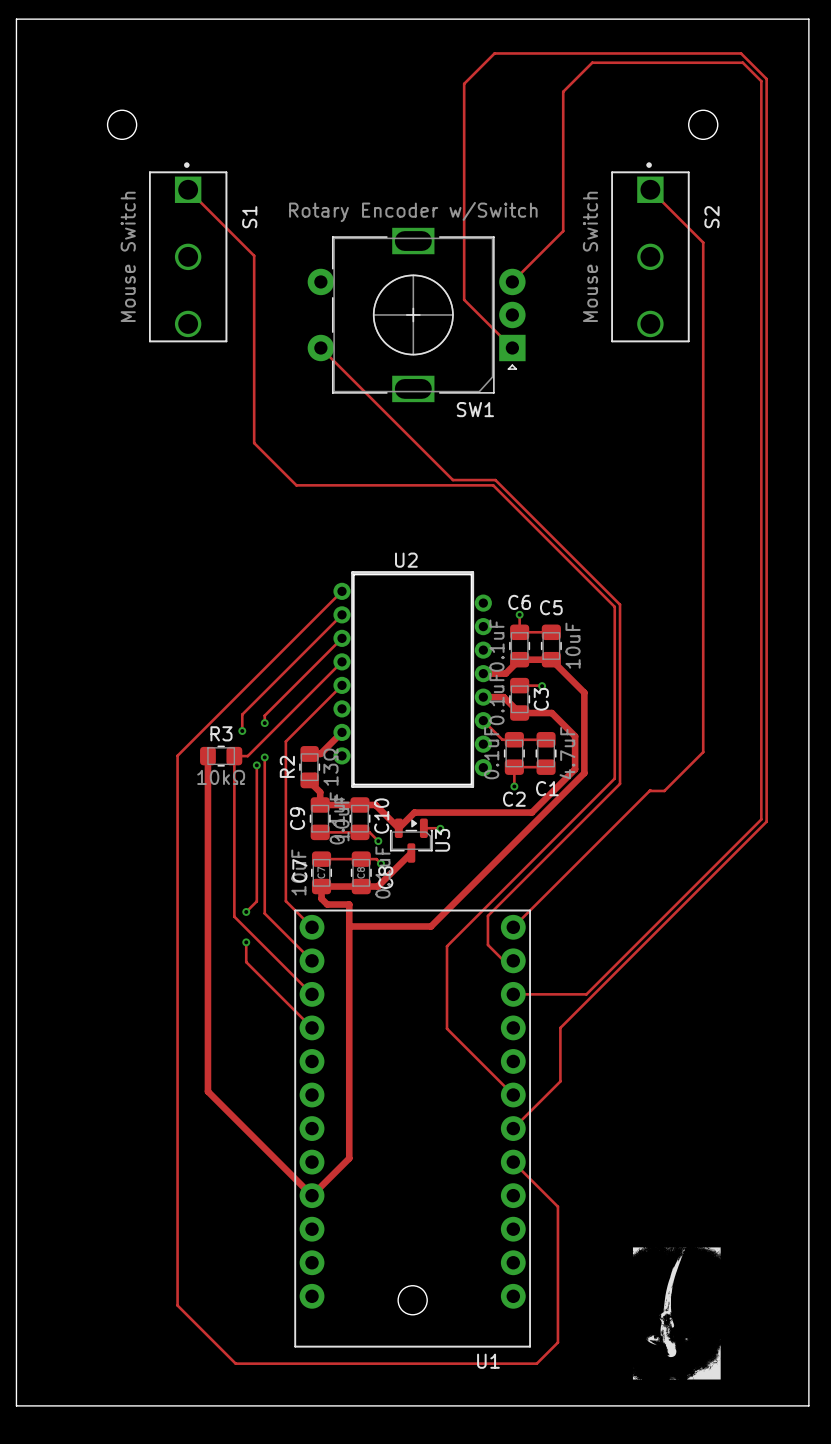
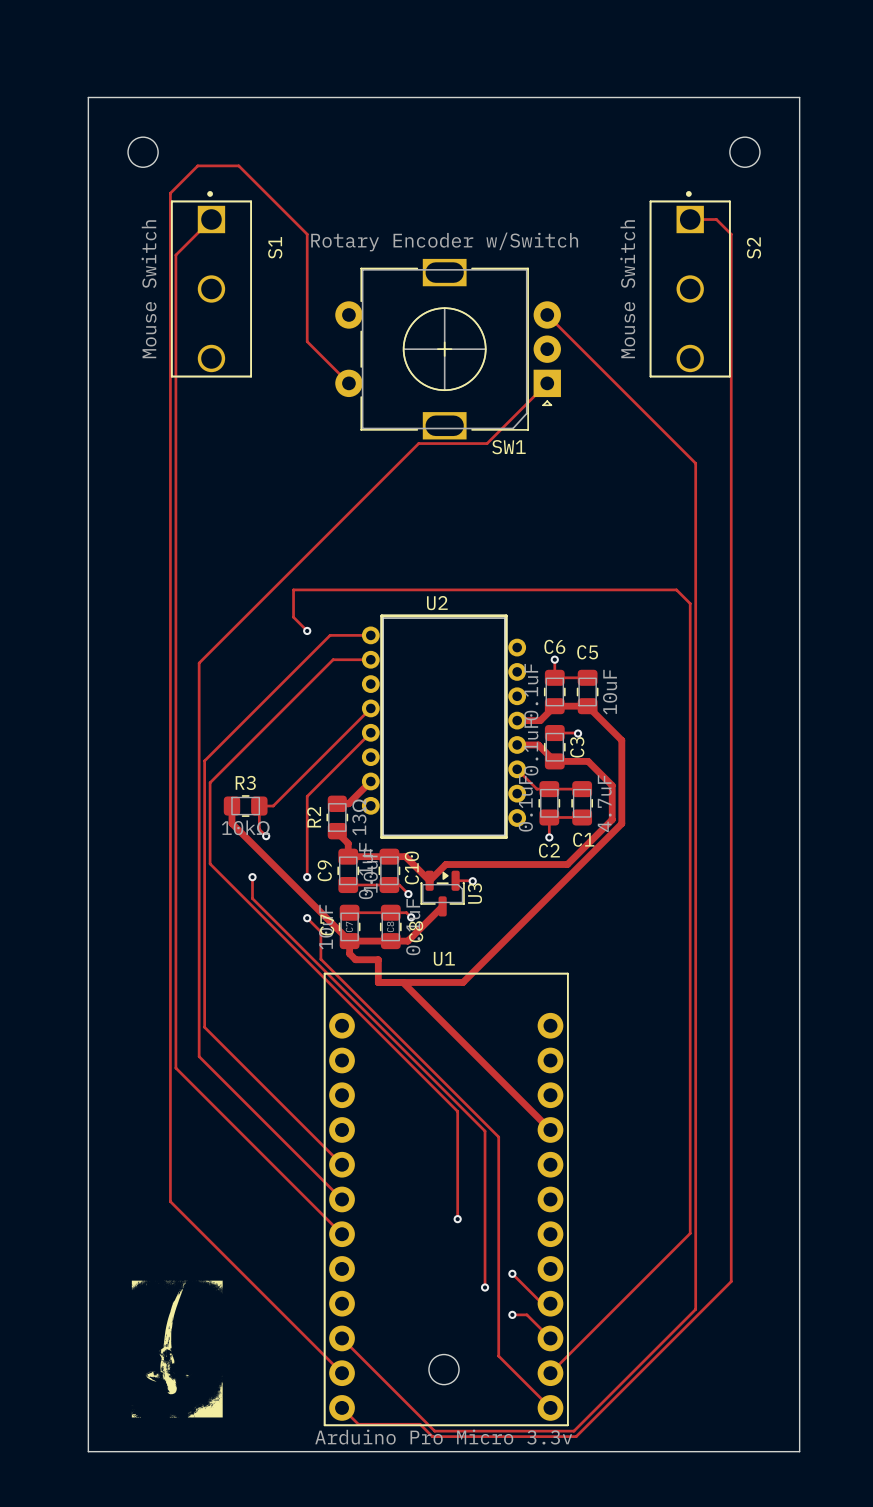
board edge: (16, 19) (808, 19) (808, 1405) (16, 1405) (16, 19) -> (88, 97) (88, 1451) (799, 1451) (799, 97) (88, 97)
track: (188, 189) (254, 255) (254, 443) (296, 485) (493, 485) (614, 606) (614, 778) (447, 946) (447, 1028) (513, 1095) -> (211, 219) (175, 255) (175, 1068) (342, 1234)
track: (650, 189) (703, 242) (703, 752) (664, 790) (649, 790) -> (690, 219) (716, 219) (731, 234) (731, 1281) (576, 1436) (432, 1436) (420, 1424) (358, 1424) (342, 1407)
track: (512, 281) (563, 231) (563, 91) (592, 62) (742, 62) (761, 81) (761, 819) (586, 994) (513, 994) -> (547, 314) (695, 463) (695, 1309) (573, 1431) (434, 1431) (342, 1338)
track: (320, 348) (452, 480) (495, 480) (620, 604) (620, 783) (487, 915) (487, 944) (503, 960) (513, 960) -> (348, 383) (307, 341) (307, 234) (238, 165) (197, 165) (170, 193) (170, 1201) (342, 1373)
track: (512, 348) (464, 299) (464, 83) (494, 53) (741, 53) (766, 79) (766, 821) (560, 1027) (560, 1081) (513, 1128) -> (547, 383) (487, 443) (418, 443) (199, 663) (199, 1056) (342, 1199)
track: none -> (307, 630) (293, 617) (293, 589) (676, 589) (690, 603) (690, 1233) (550, 1373)
via: none -> (307, 630)
track: (342, 591) (177, 755) (177, 1305) (235, 1363) (536, 1363) (557, 1342) (557, 1206) (513, 1162) -> (370, 635) (330, 635) (204, 760) (204, 1027) (342, 1164)
track: (342, 614) (242, 714) (242, 731) -> (370, 659) (333, 659) (210, 782) (210, 863) (457, 1111) (457, 1219)
track: (342, 638) (264, 715) (264, 723) -> none
via: (264, 723) -> none
via: (242, 731) -> none
track: (285, 741) (285, 901) (312, 927) -> (312, 790) (307, 796) (307, 877)
track: (264, 757) (264, 913) (312, 960) -> none
via: (264, 757) -> none
track: (256, 765) (256, 901) (246, 911) -> none
via: (256, 765) -> none
track: (207, 772) (207, 1091) (312, 1195) (349, 1158) (349, 926) -> (231, 823) (349, 941)
track: (234, 778) (234, 916) (312, 994) -> (259, 829) (266, 836)
via: none -> (266, 836)
track: (650, 790) (513, 927) -> none
track: none -> (252, 877) (252, 898) (485, 1131) (485, 1287)
via: none -> (252, 877)
via: none -> (307, 877)
track: none -> (307, 918) (320, 931) (320, 959) (498, 1137) (498, 1356) (550, 1407)
via: none -> (307, 918)
via: (246, 911) -> none
track: none -> (402, 982) (550, 1129)
track: (246, 942) (246, 962) (312, 1027) -> none
via: (246, 942) -> none
U1 rotation: 0° (412, 1128) -> 180° (446, 1199)
via: none -> (457, 1219)
track: none -> (512, 1273) (542, 1303) (550, 1303)
via: none -> (512, 1273)
drawing: none -> [131, 1280, 223, 1418]
via: none -> (485, 1287)
track: none -> (512, 1314) (526, 1314) (550, 1338)
via: none -> (512, 1314)
drawing: [632, 1247, 721, 1380] -> none
U1 name position: U1 (488, 1361) -> U1 (444, 958)
U1 value: none -> Arduino Pro Micro 3.3v (443, 1437)

